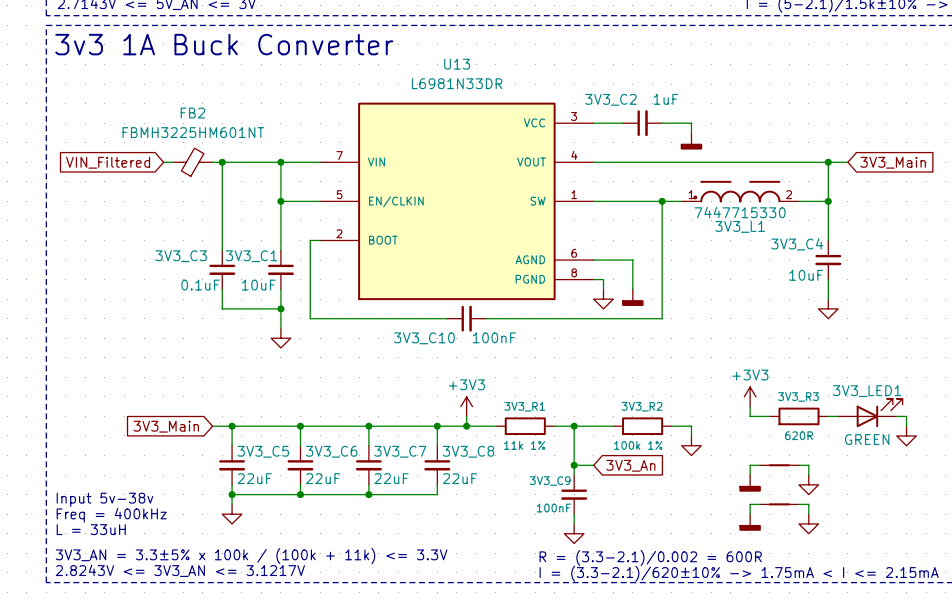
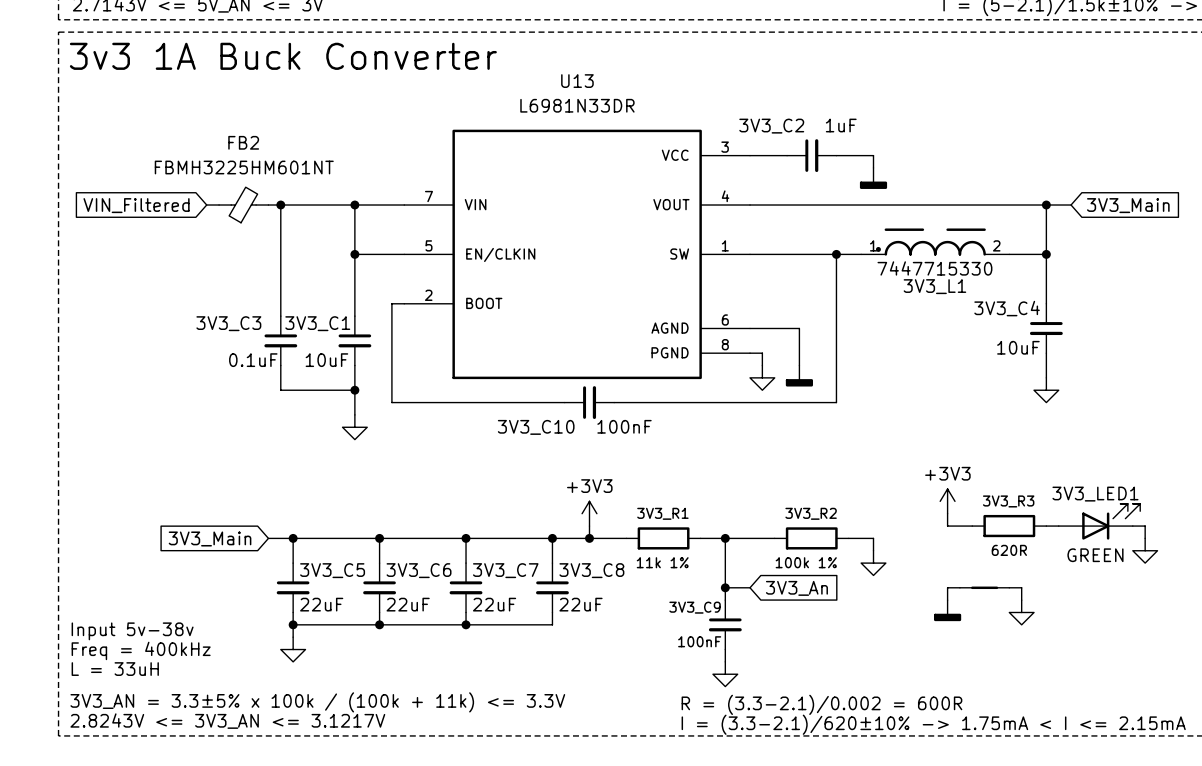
wire: (759, 504) (750, 504) (750, 514) -> none
part: (779, 504) -> none
wire: (798, 504) (808, 504) (808, 514) -> none
power symbol: (750, 522) -> none
power symbol: (808, 523) -> none

